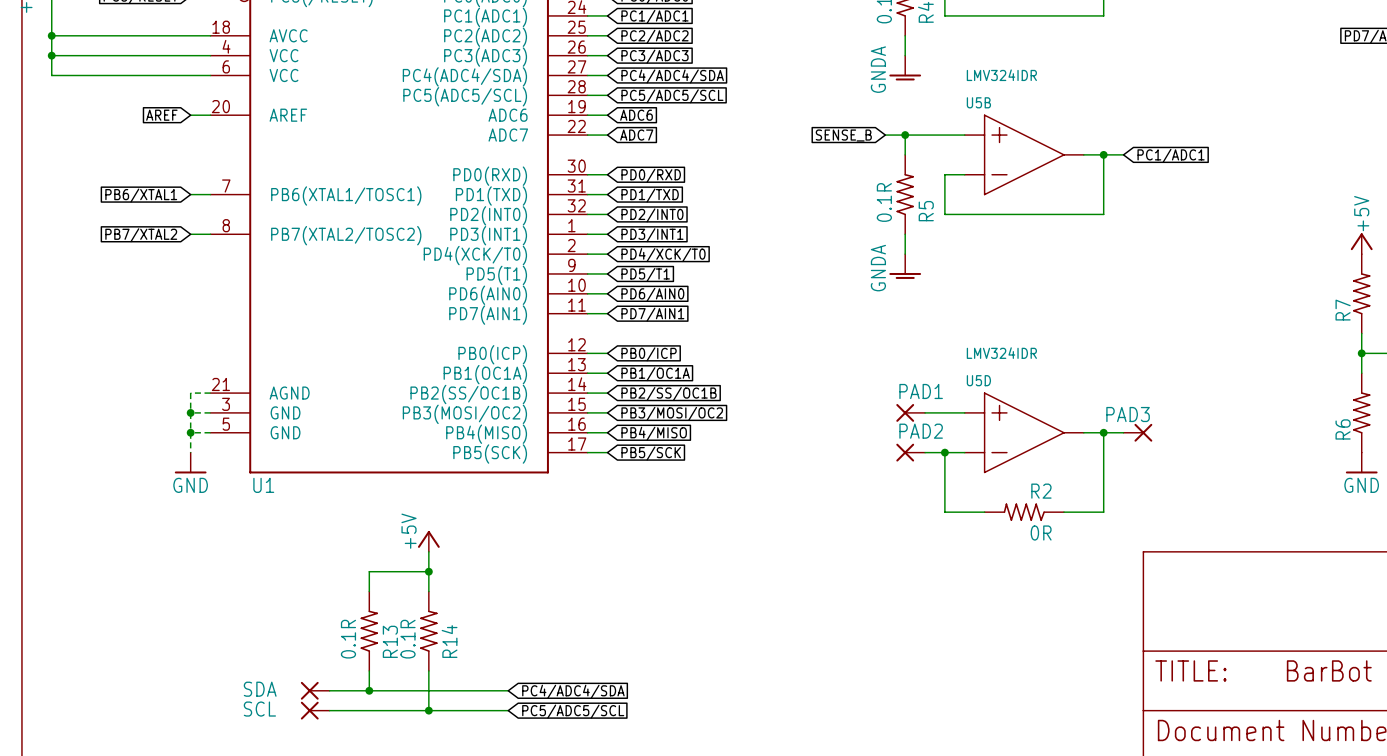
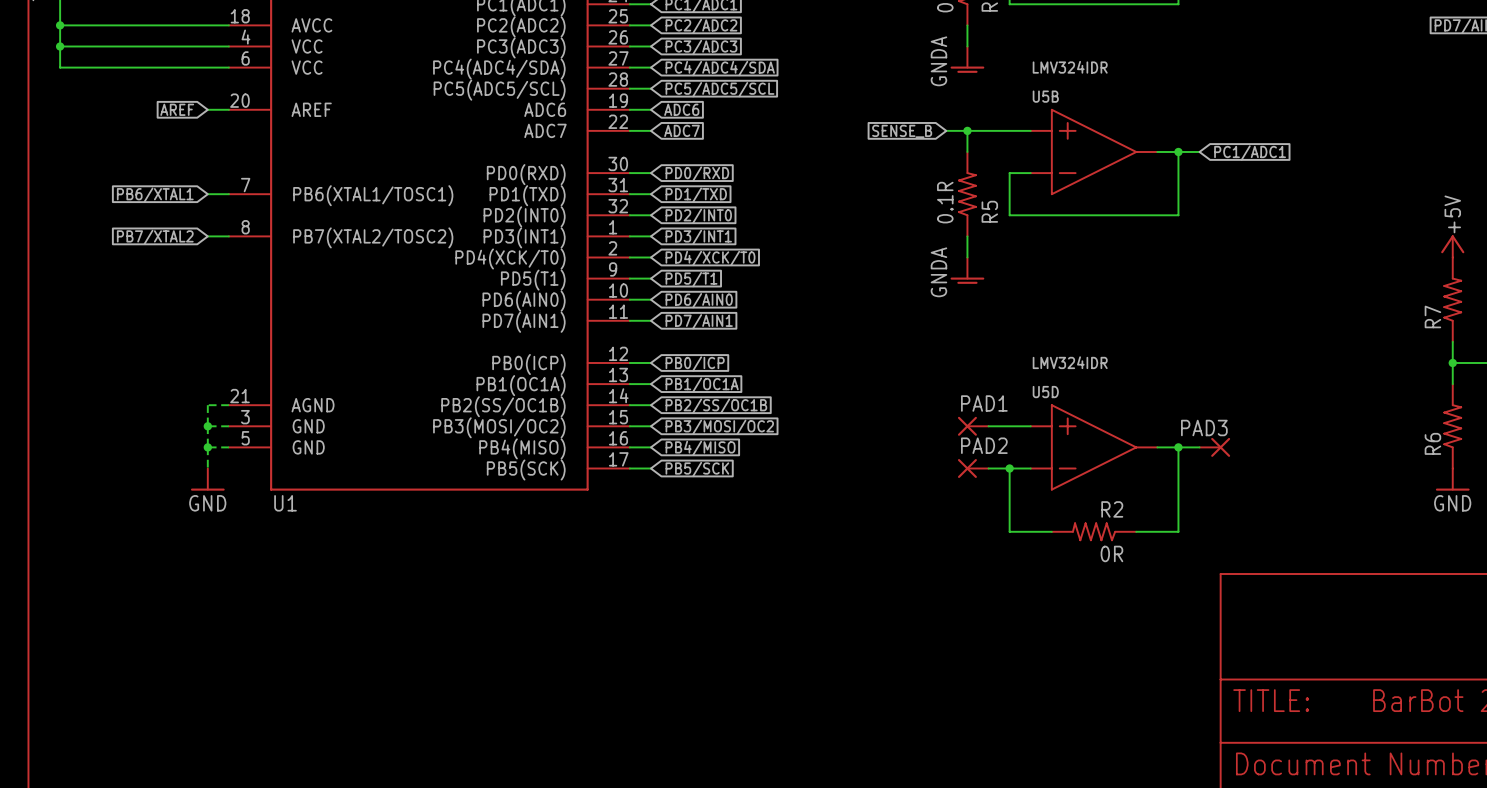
power symbol: +5V (428, 541) -> none
wire: (428, 551) (428, 591) -> none
wire: (428, 571) (369, 571) (369, 591) -> none
junction: (428, 571) -> none
R13: 0.1R (369, 631) -> none
R14: 0.1R (428, 631) -> none
wire: (369, 670) (369, 690) -> none
wire: (428, 670) (428, 710) -> none
SDA: (315, 690) -> none
wire: (329, 690) (508, 690) -> none
junction: (369, 690) -> none
global label: PC4/ADC4/SDA (573, 691) -> none
SCL: (315, 710) -> none
wire: (329, 710) (508, 710) -> none
junction: (428, 710) -> none
global label: PC5/ADC5/SCL (573, 711) -> none

